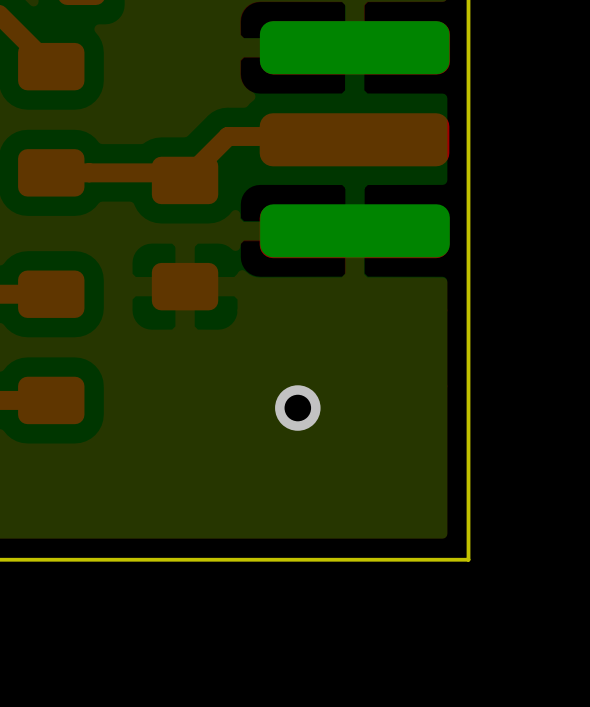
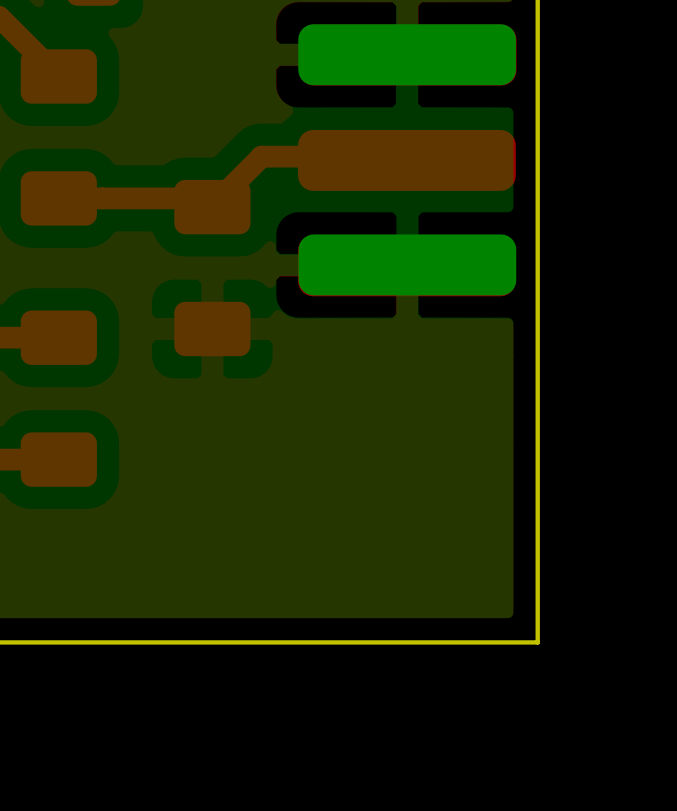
via: (297, 408) -> none

